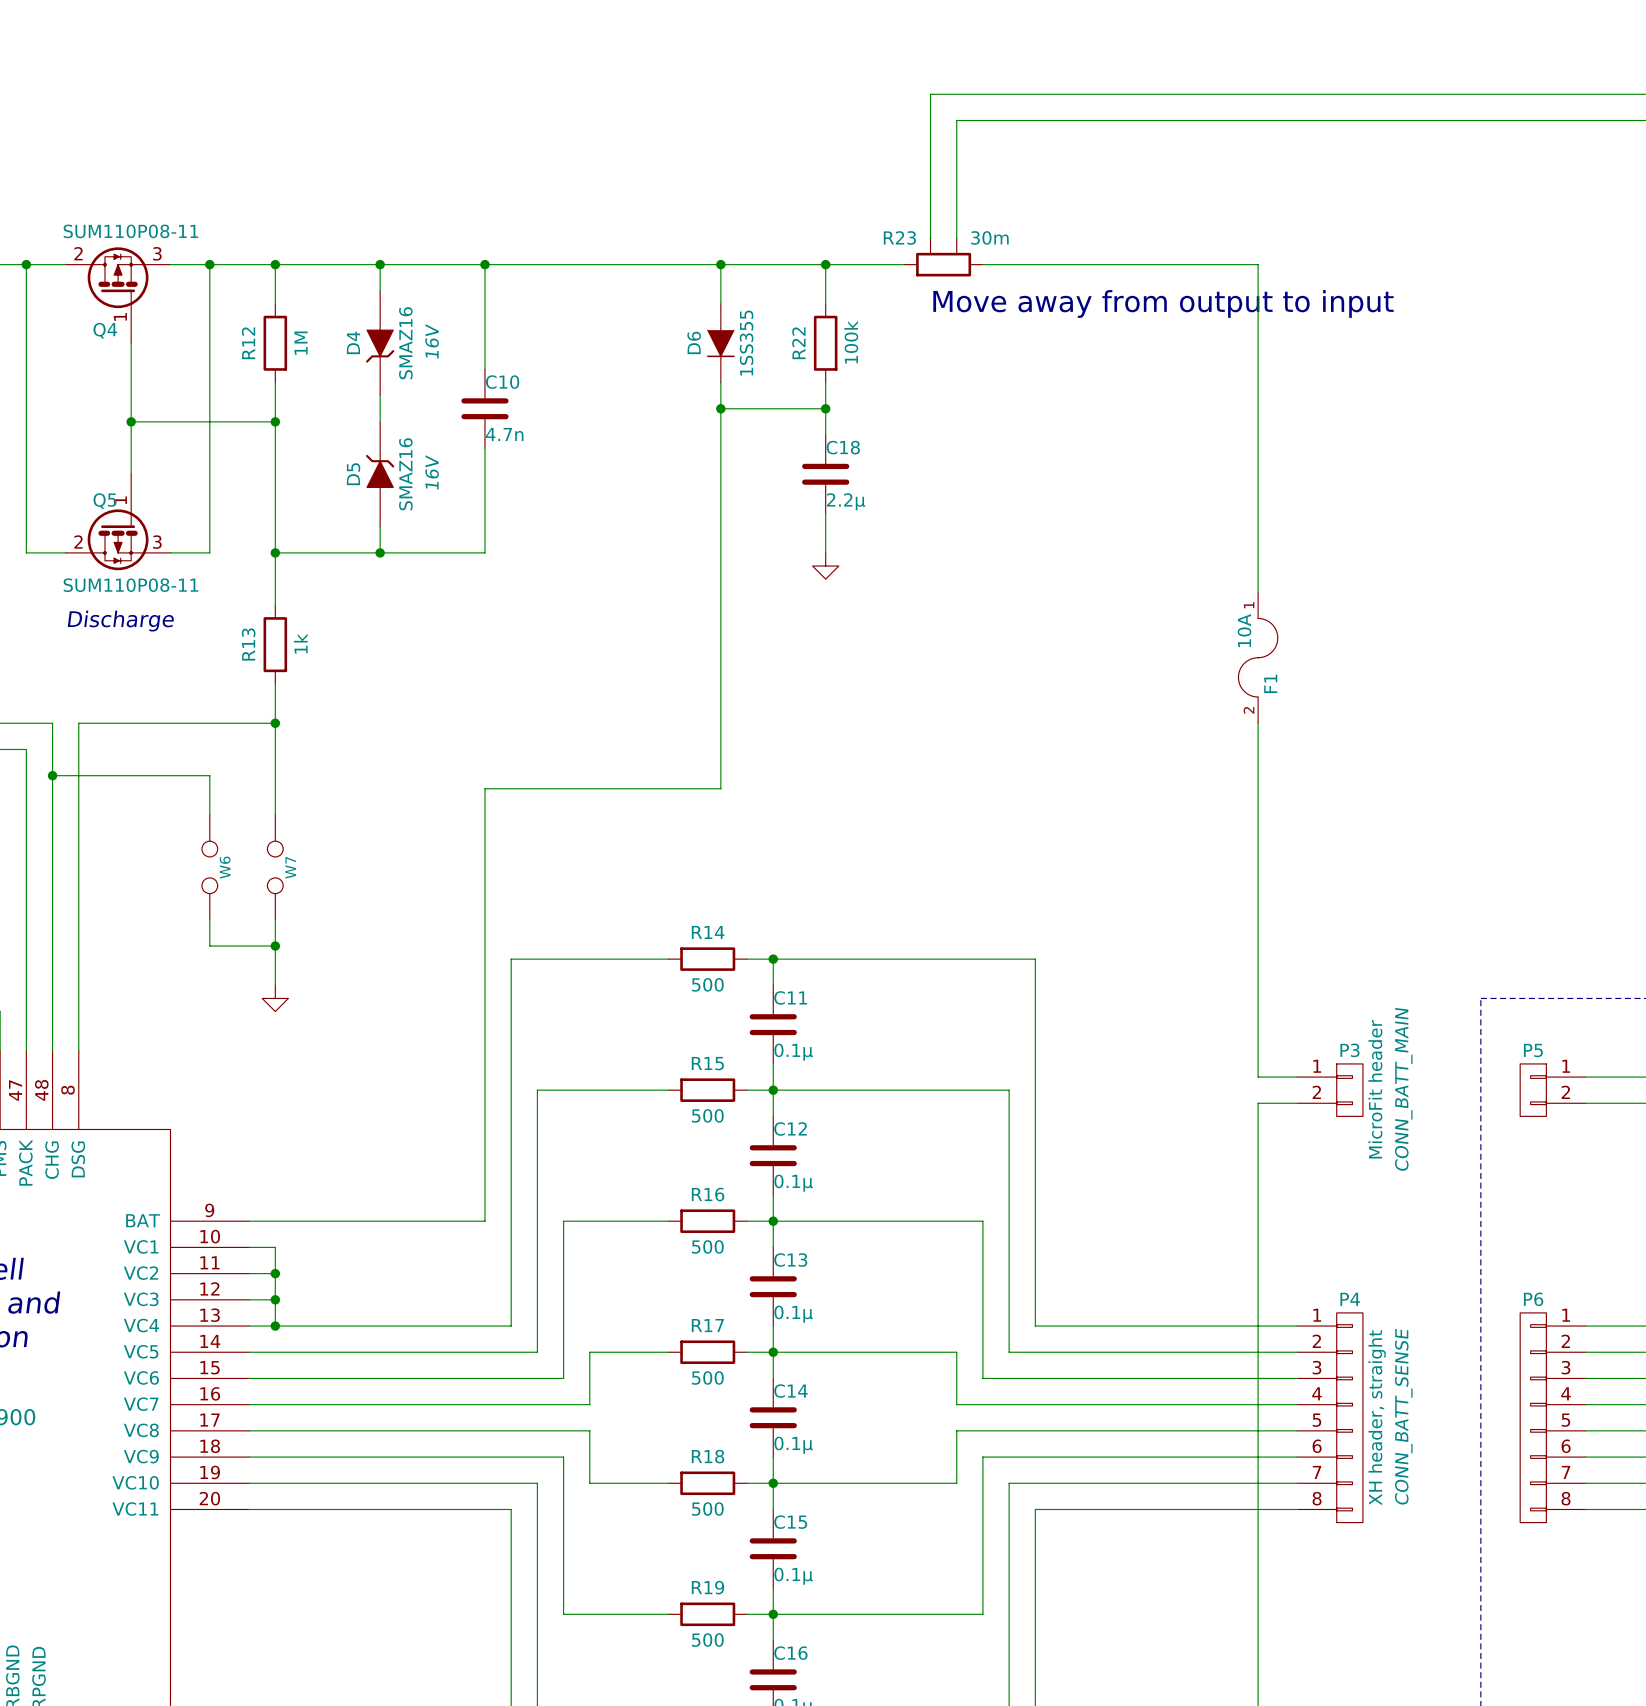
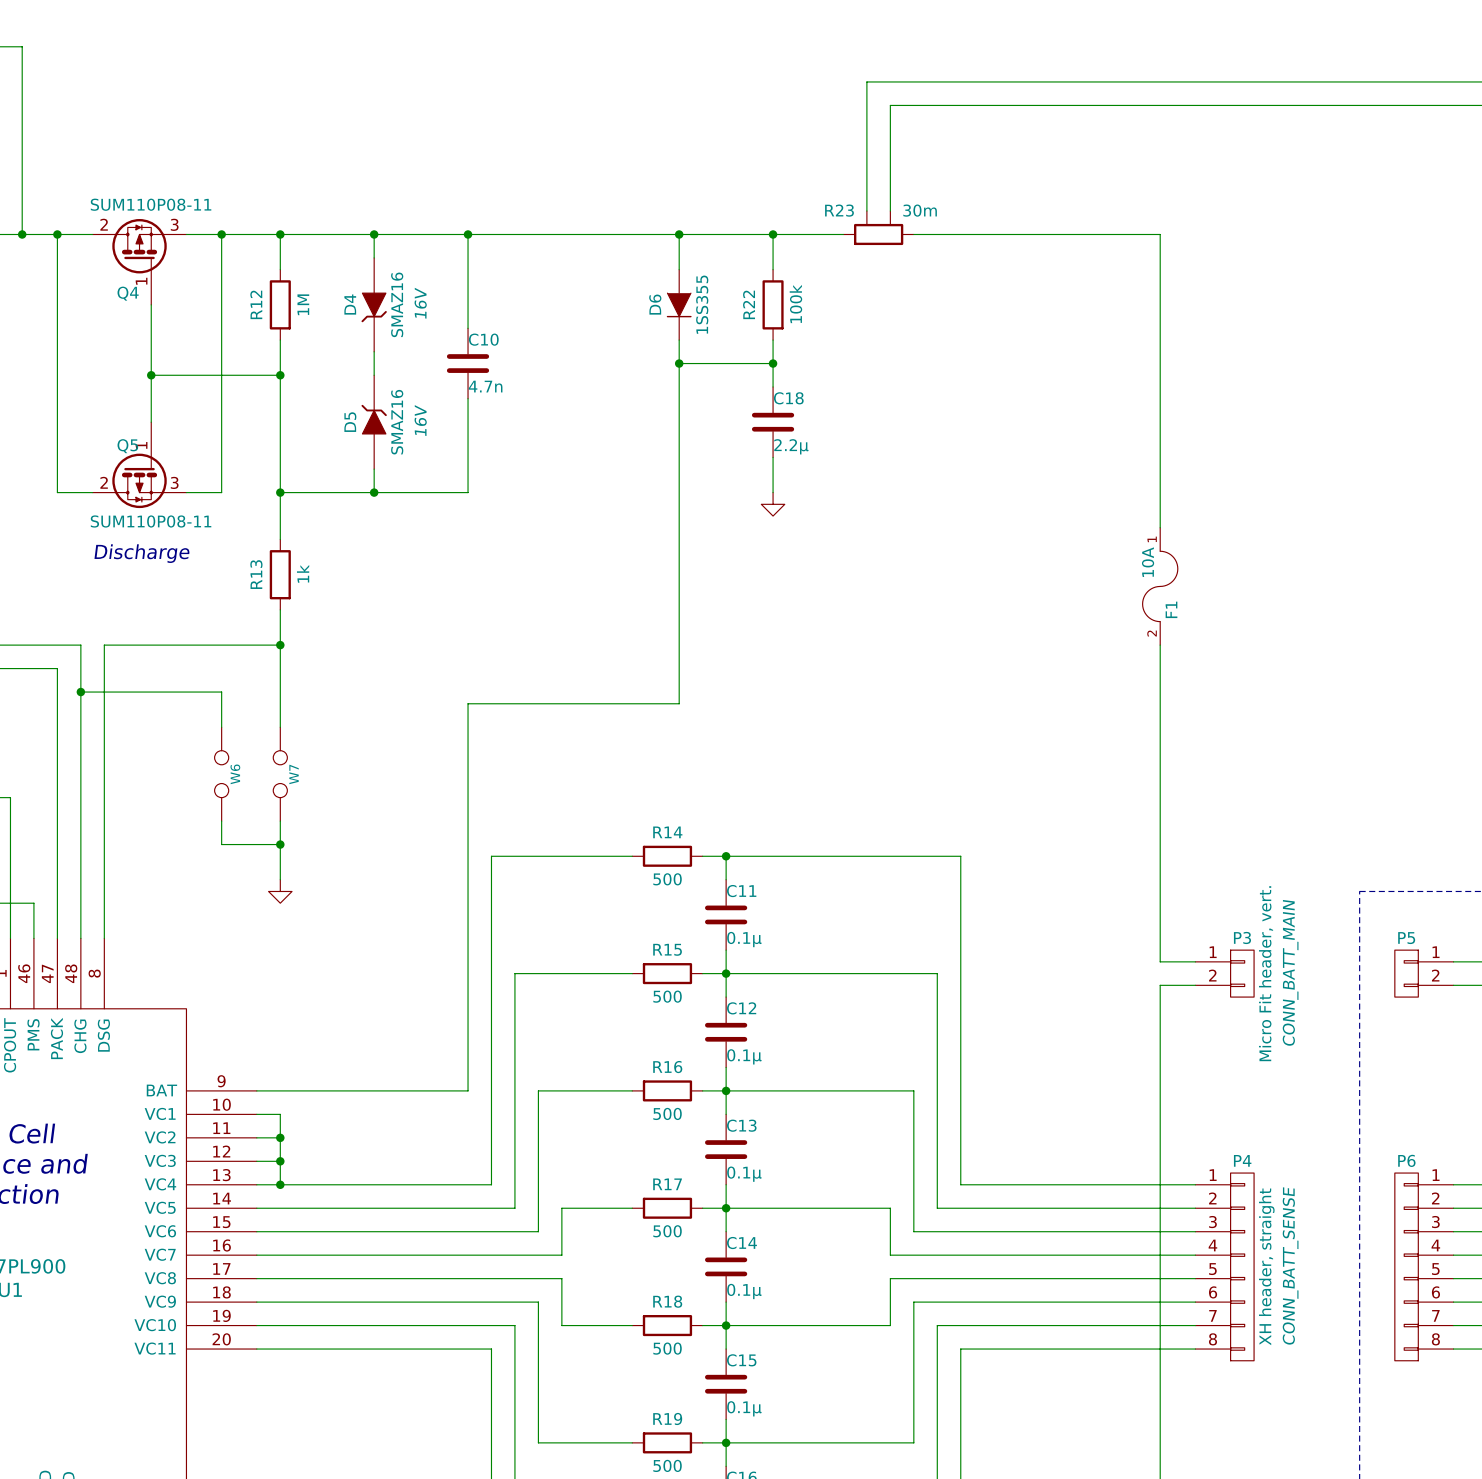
text: Move away from output to input (1163, 303) -> none
P3 value: MicroFit header (1375, 1089) -> Micro Fit header, vert. (1266, 973)

